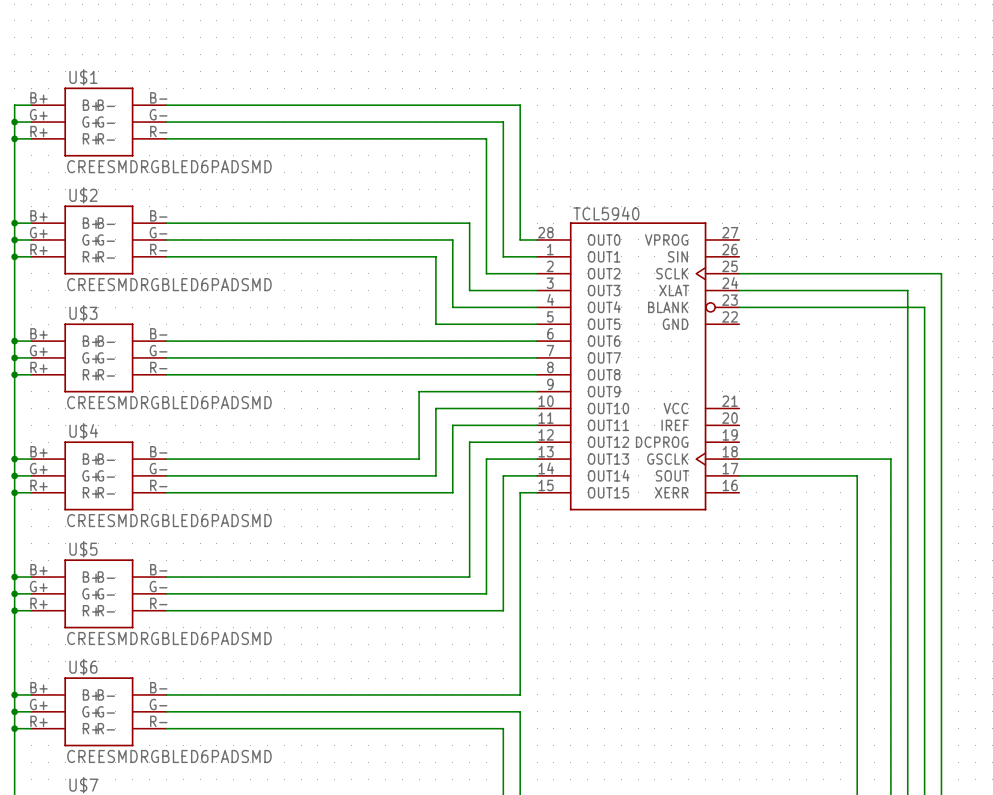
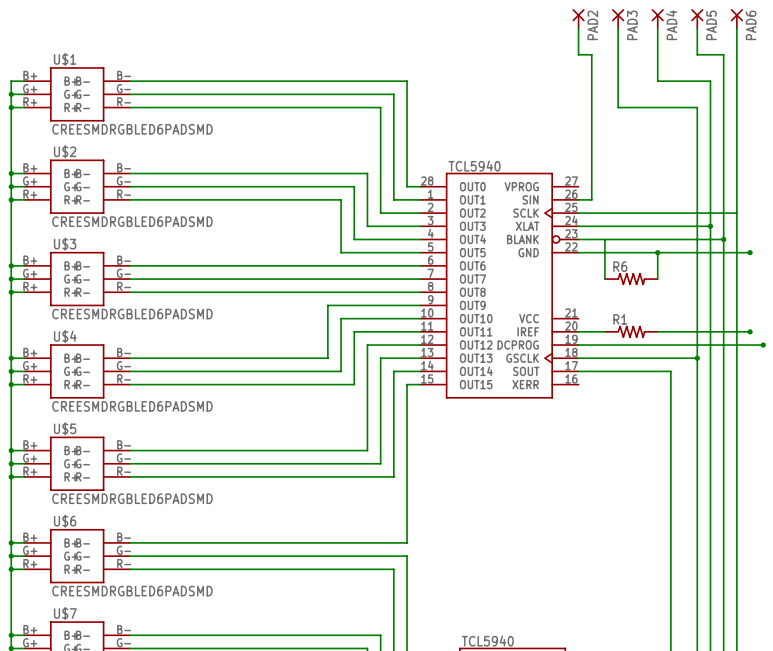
PAD2: none -> (578, 18)
PAD3: none -> (618, 18)
PAD4: none -> (657, 18)
PAD5: none -> (697, 18)
PAD6: none -> (736, 18)
wire: none -> (578, 28) (578, 54) (591, 54) (591, 199) (578, 199)
wire: none -> (618, 28) (618, 107) (697, 107) (697, 358)
wire: none -> (657, 28) (657, 81) (710, 81) (710, 226)
wire: none -> (697, 28) (697, 54) (723, 54) (723, 239)
wire: none -> (736, 28) (736, 213)
junction: none -> (710, 226)
wire: none -> (604, 239) (604, 279)
junction: none -> (723, 239)
wire: none -> (578, 252) (750, 252)
wire: none -> (657, 252) (657, 279)
junction: none -> (657, 252)
junction: none -> (750, 252)
R6: none -> (631, 279)
wire: none -> (578, 331) (604, 331)
R1: none -> (631, 331)
wire: none -> (657, 331) (750, 331)
junction: none -> (750, 331)
wire: none -> (578, 345) (763, 345)
junction: none -> (763, 345)
junction: none -> (697, 358)

